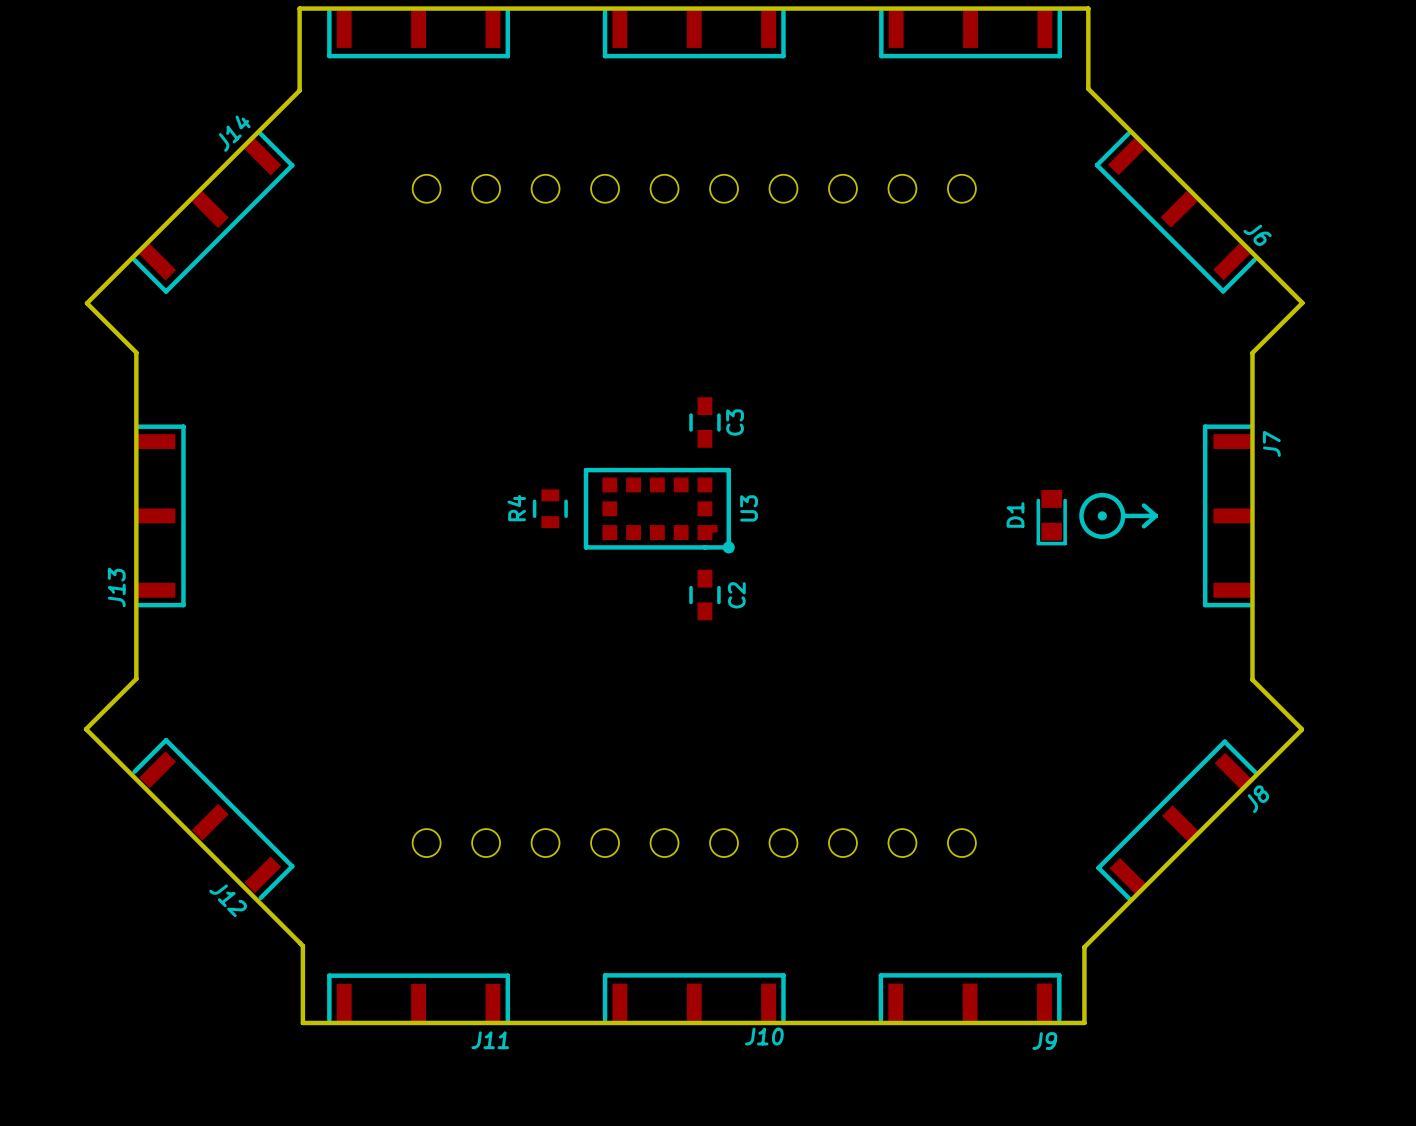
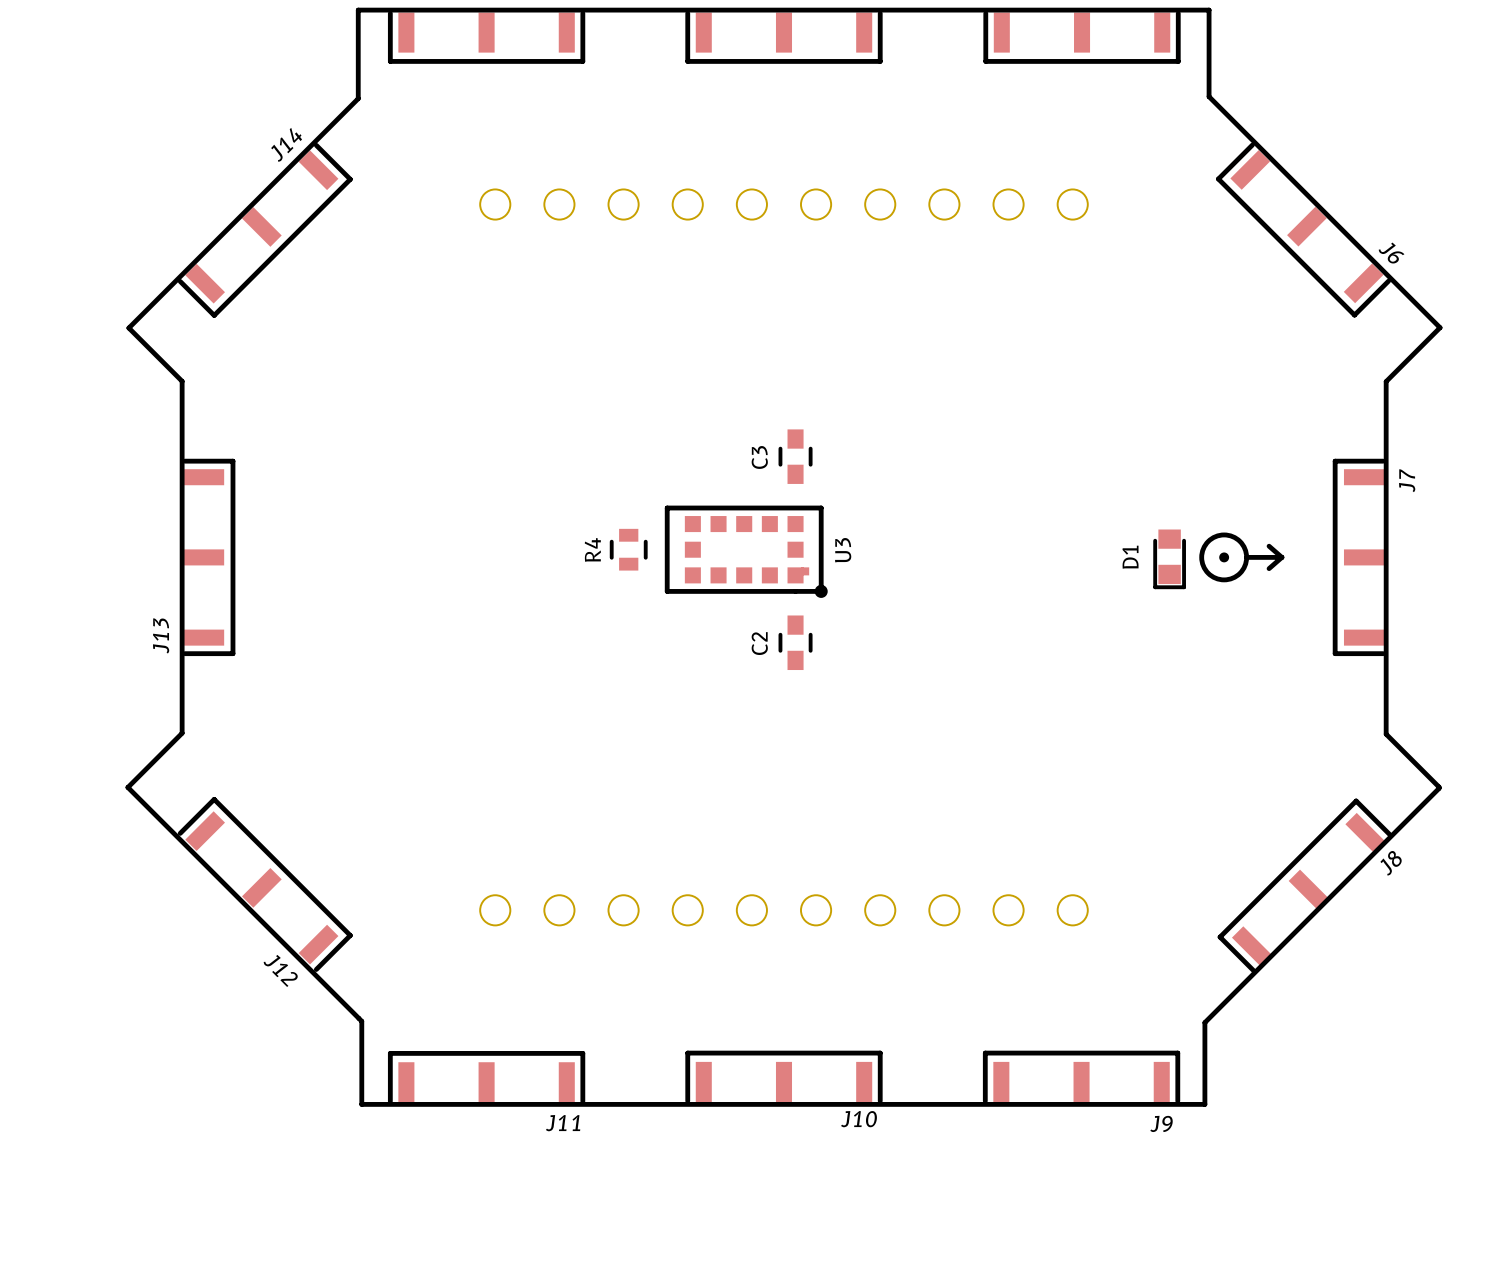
C3 name position: C3 (735, 422) -> C3 (759, 457)
C2 name position: C2 (736, 595) -> C2 (759, 643)

